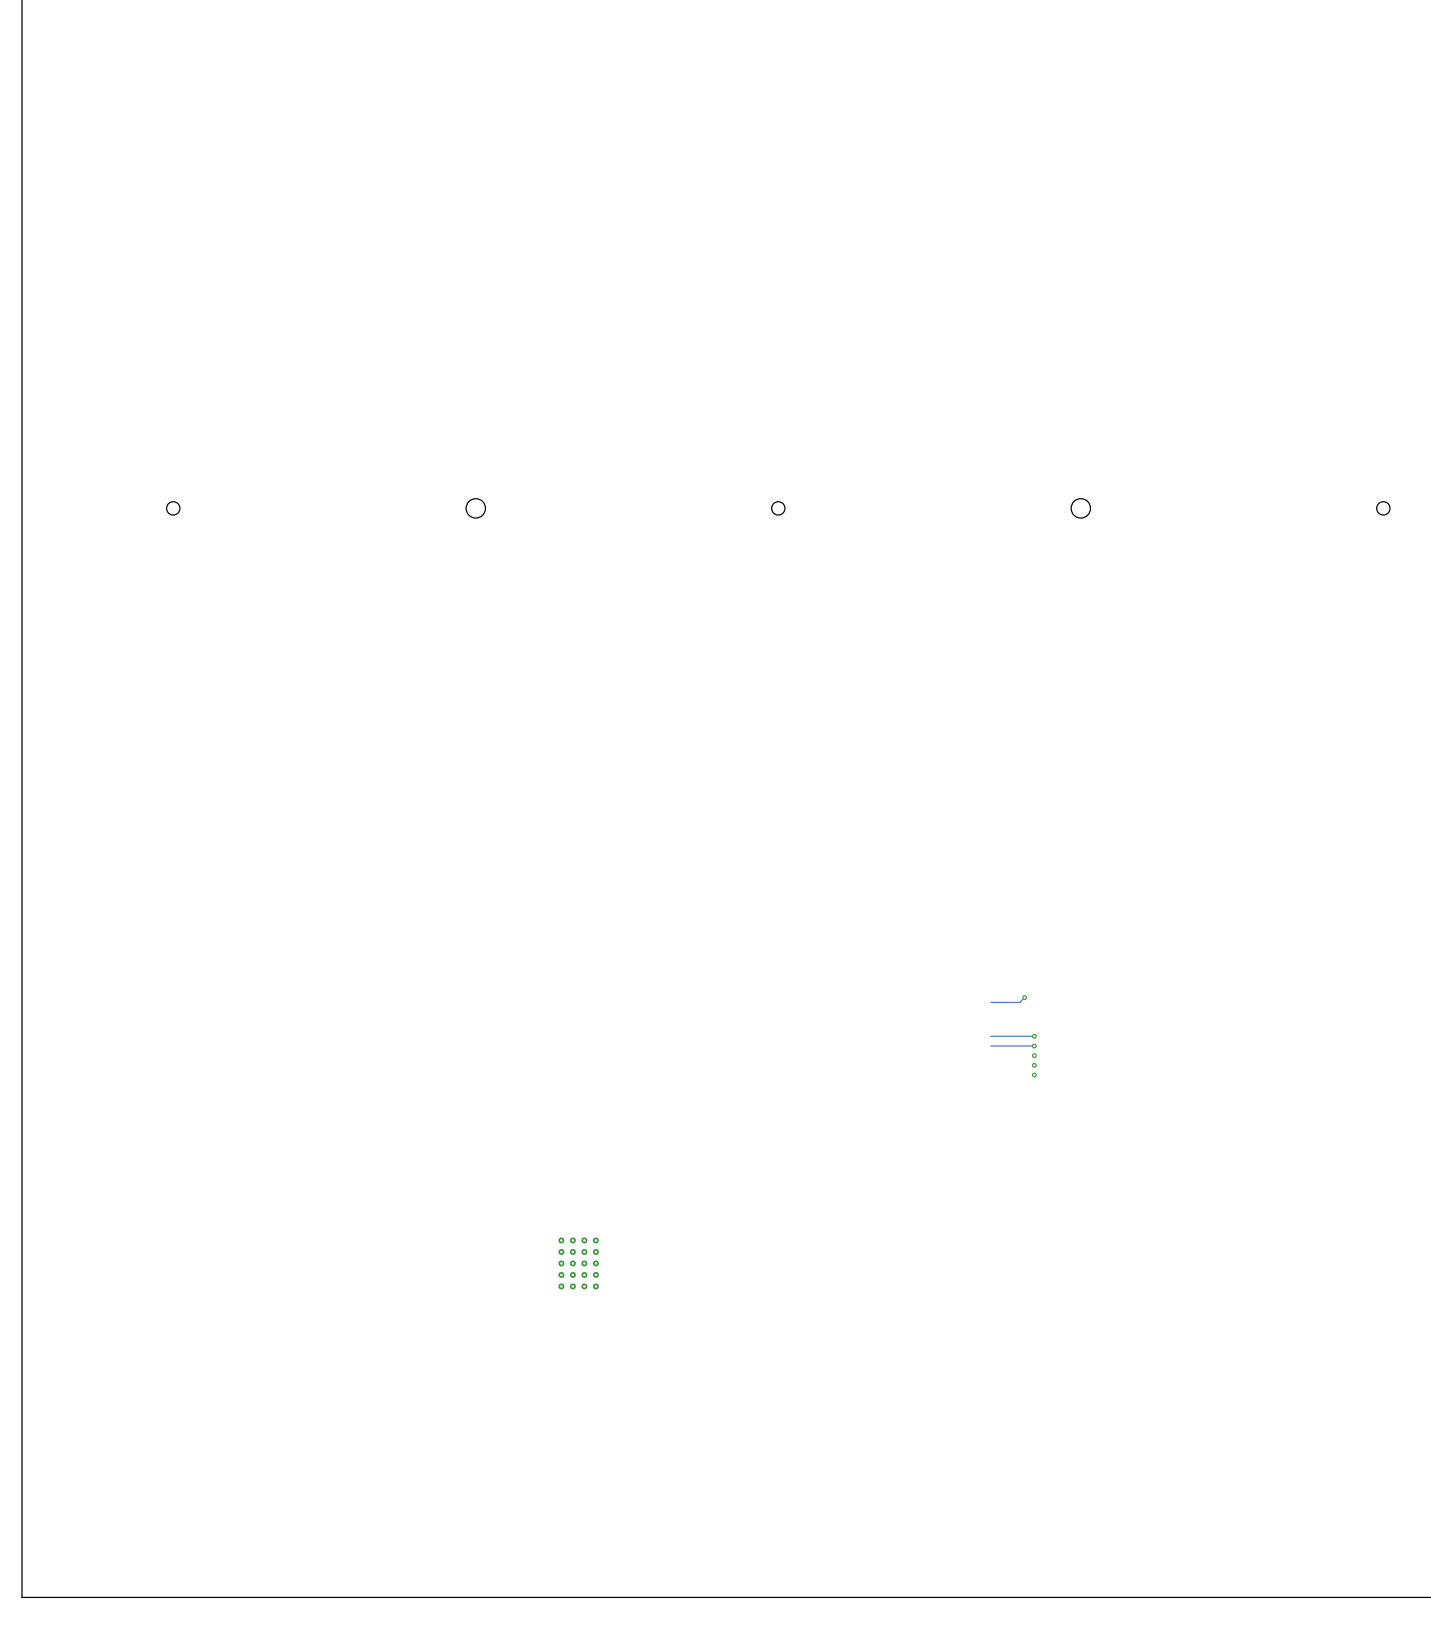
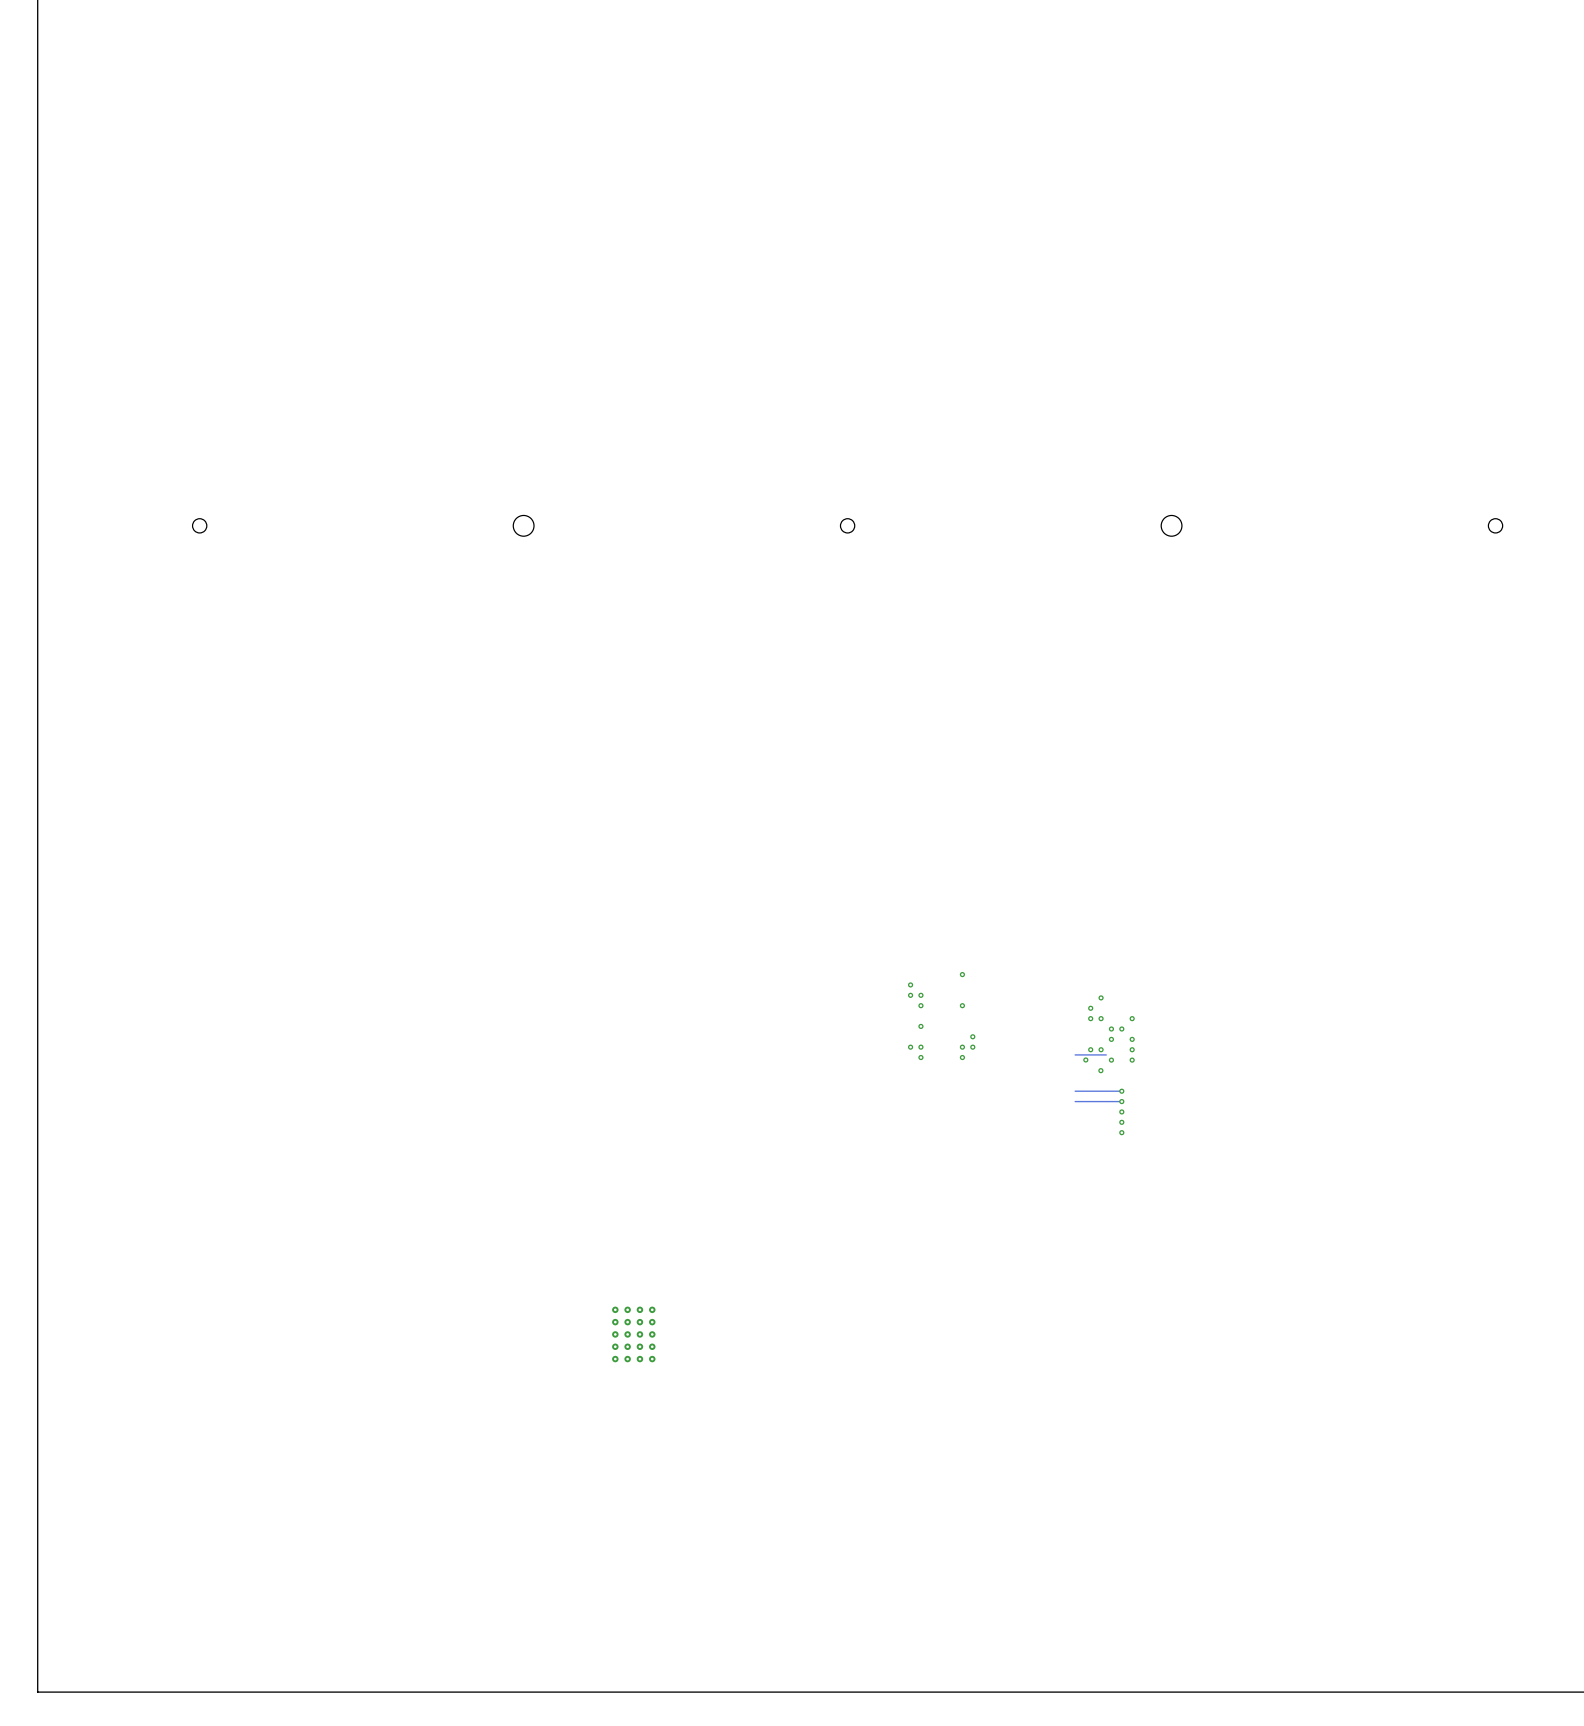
via: none -> (962, 974)
via: none -> (910, 984)
via: none -> (910, 995)
via: none -> (920, 995)
via: none -> (1101, 997)
via: none -> (920, 1005)
via: none -> (962, 1005)
via: none -> (1090, 1008)
via: none -> (1090, 1018)
via: none -> (1101, 1018)
via: none -> (1132, 1018)
via: none -> (920, 1026)
via: none -> (1111, 1029)
via: none -> (1121, 1029)
via: none -> (972, 1036)
via: none -> (1111, 1039)
via: none -> (1132, 1039)
via: none -> (910, 1047)
via: none -> (920, 1047)
via: none -> (962, 1047)
via: none -> (972, 1047)
via: none -> (1090, 1049)
via: none -> (1101, 1049)
track: (1024, 997) (1019, 1002) -> none
via: (1024, 997) -> none
via: none -> (1132, 1049)
via: none -> (920, 1057)
via: none -> (962, 1057)
via: none -> (1085, 1059)
via: none -> (1111, 1060)
via: none -> (1132, 1060)
via: none -> (1100, 1070)

